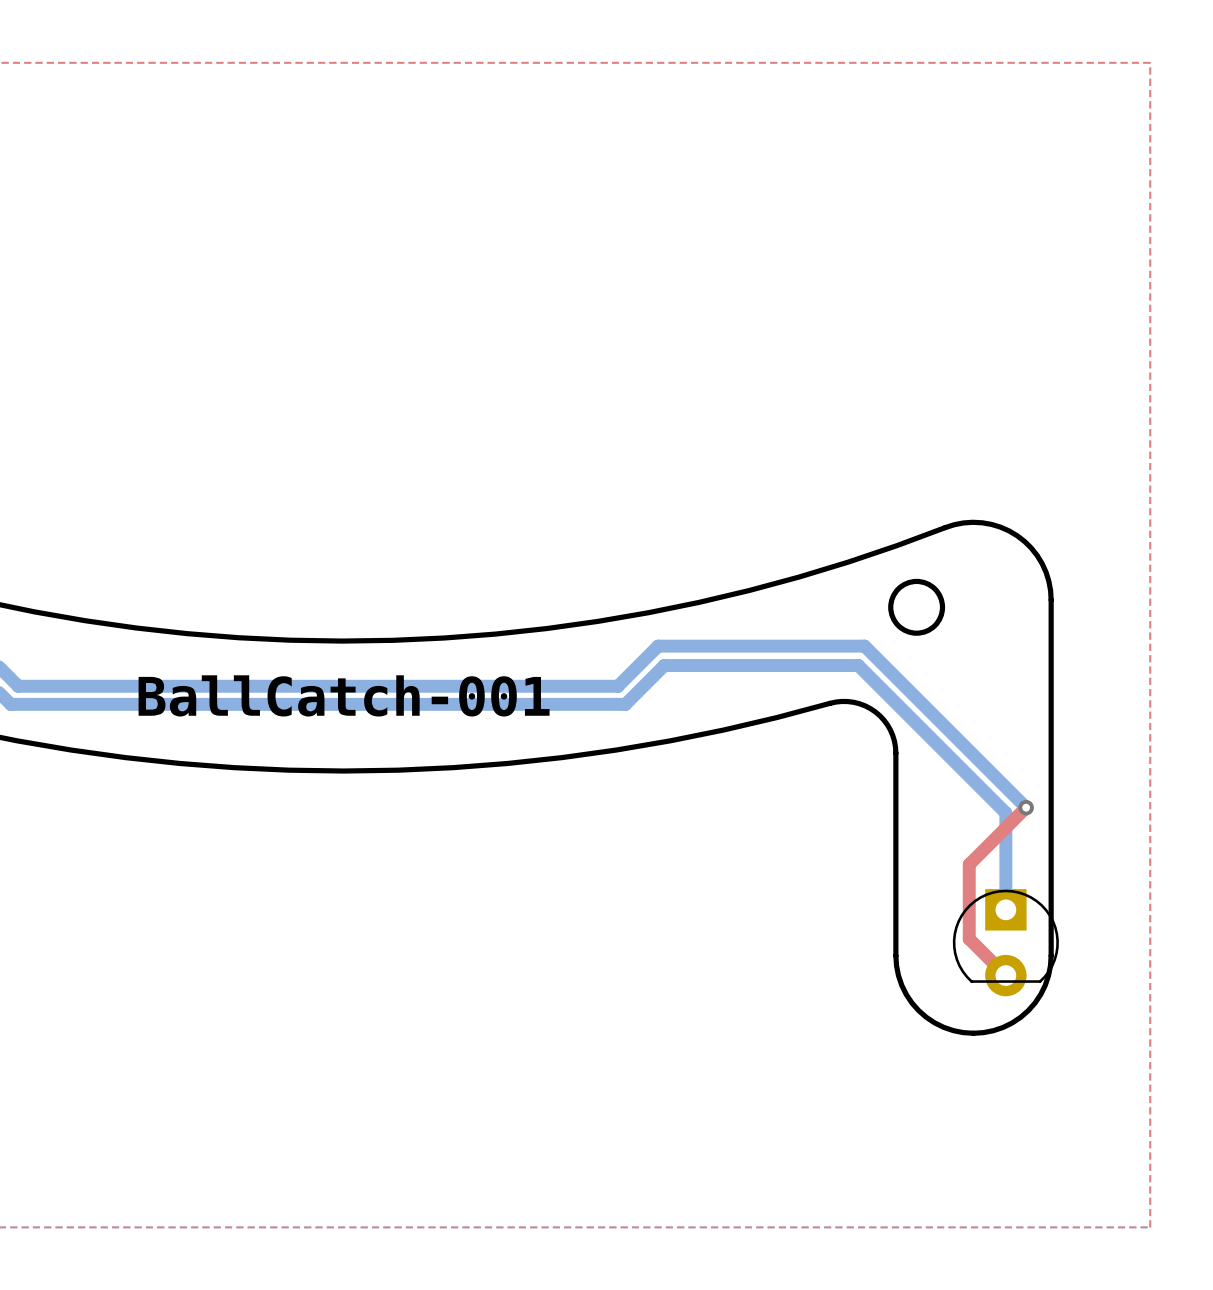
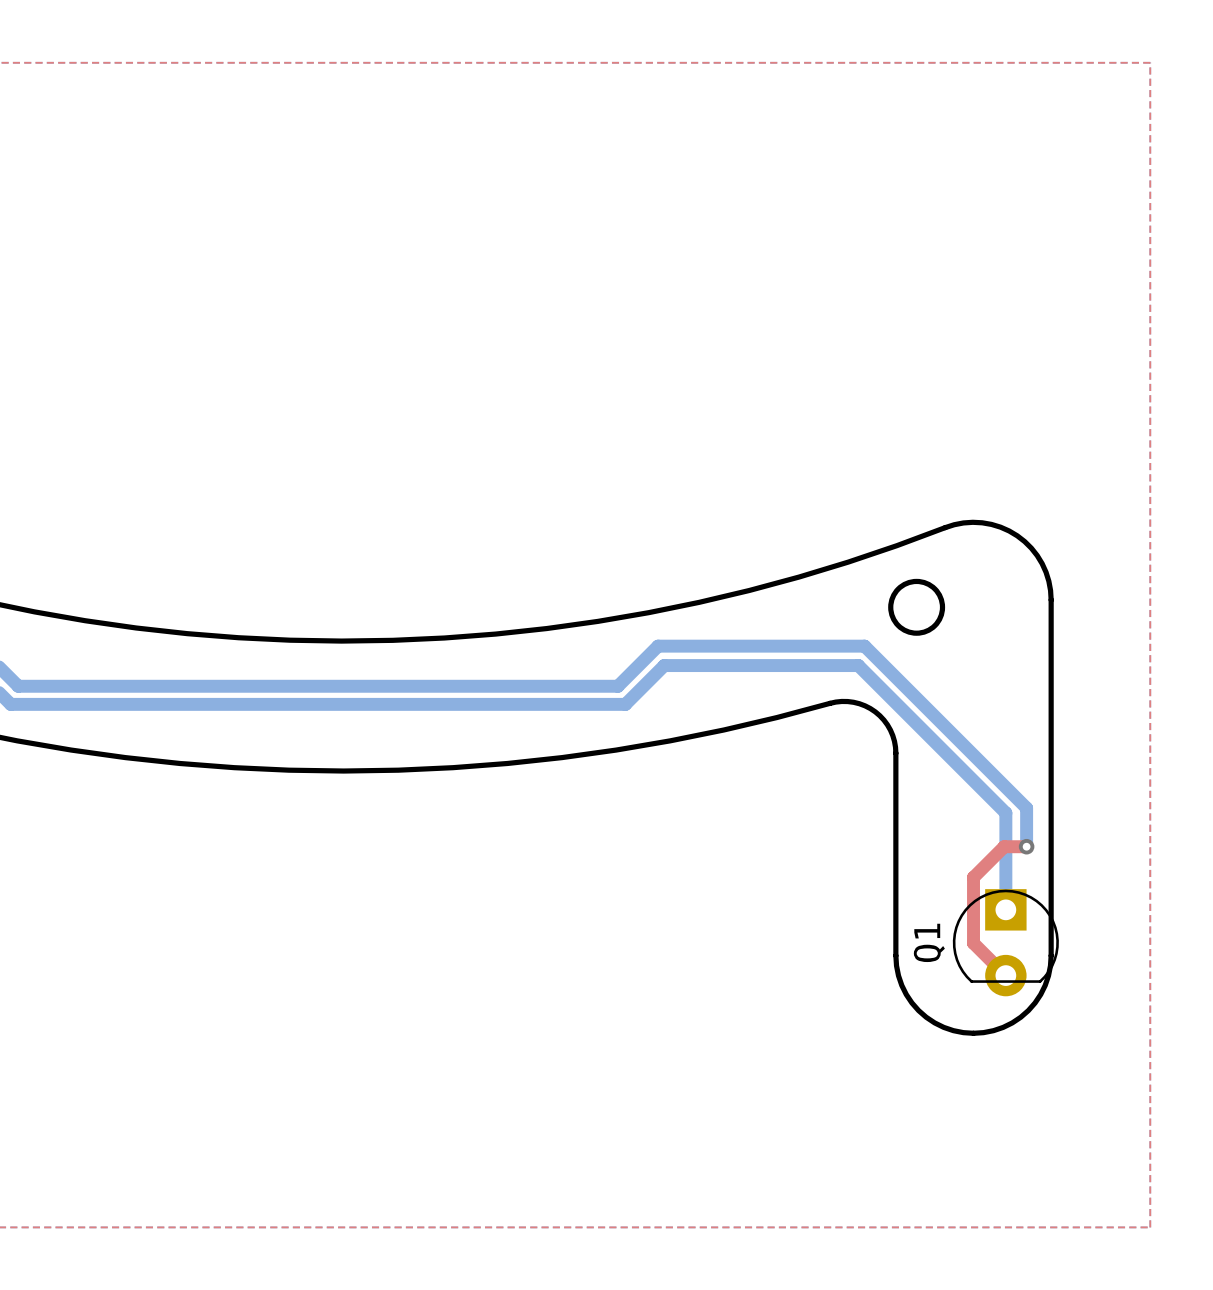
text: BallCatch-001 (344, 695) -> none
bottom track: none -> (1026, 807) (1026, 846)
top track: (1026, 807) (969, 864) (969, 938) (973, 943) -> (1026, 846) (1004, 846) (973, 877) (973, 943)
via position: (1026, 807) -> (1026, 846)
Q1 name: none -> Q1 (929, 942)

